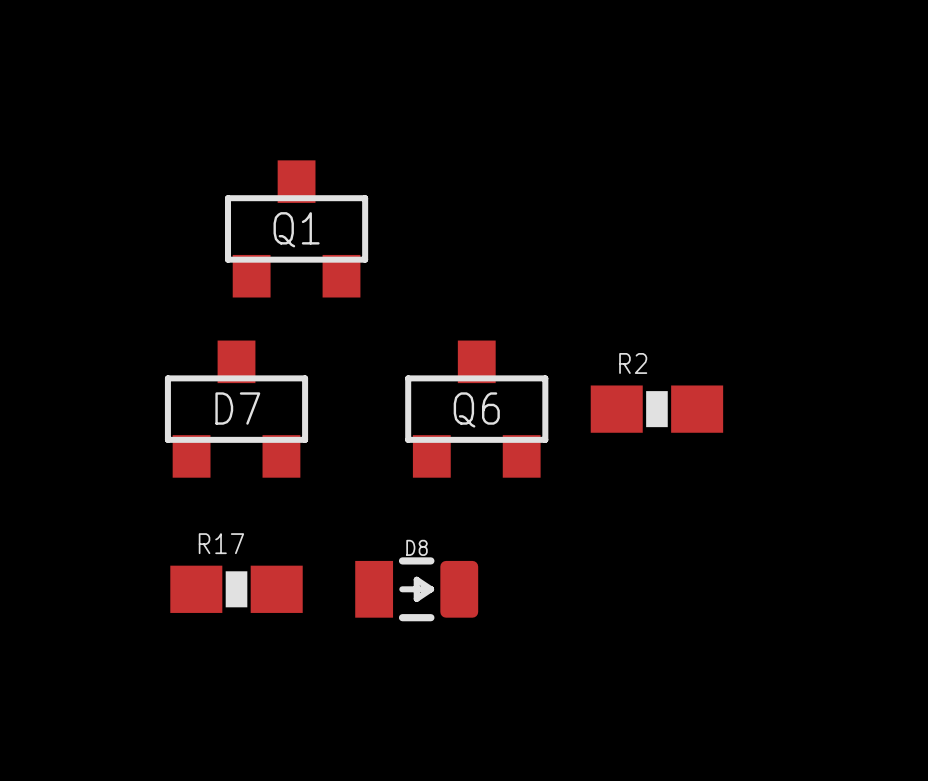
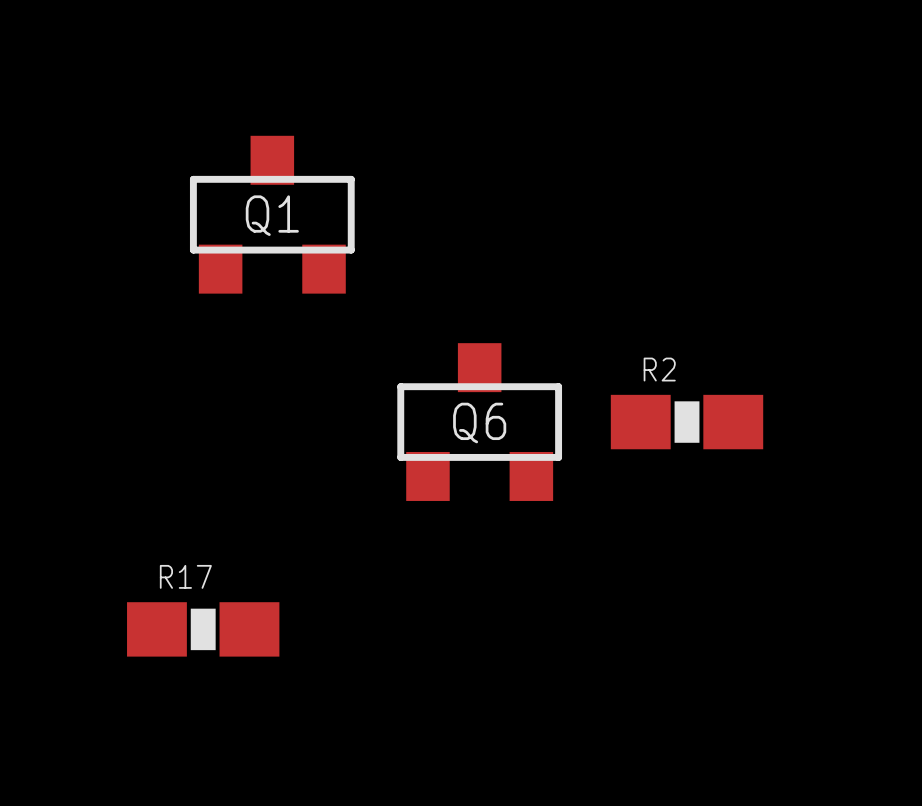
D7: (236, 409) -> none
D8: (416, 589) -> none

